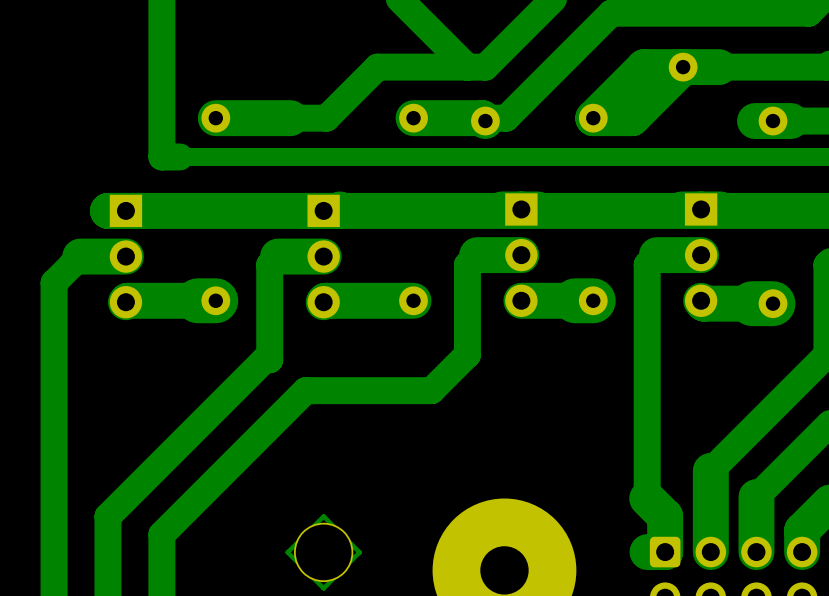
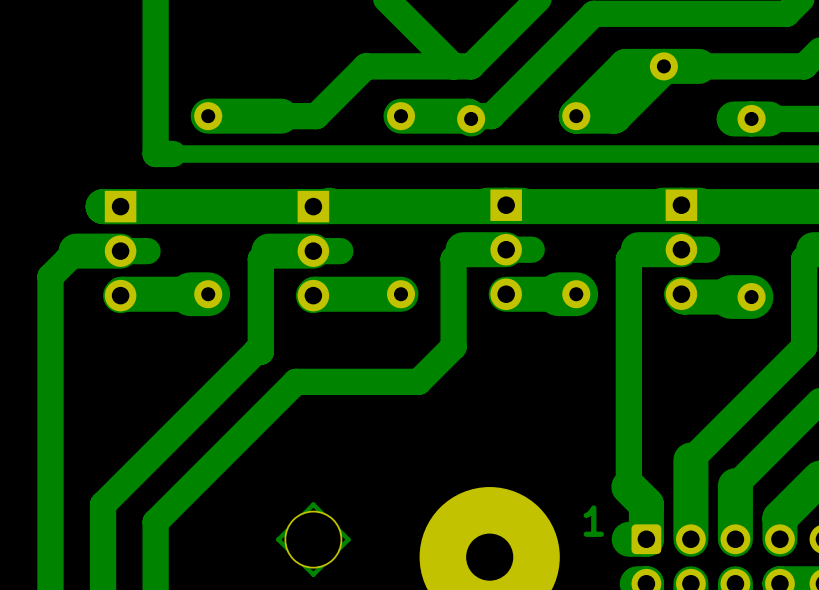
track: none -> (531, 249) (506, 249)
track: none -> (707, 249) (681, 249)
track: none -> (147, 251) (120, 251)
track: none -> (340, 251) (313, 251)
text: none -> 1 (593, 521)

